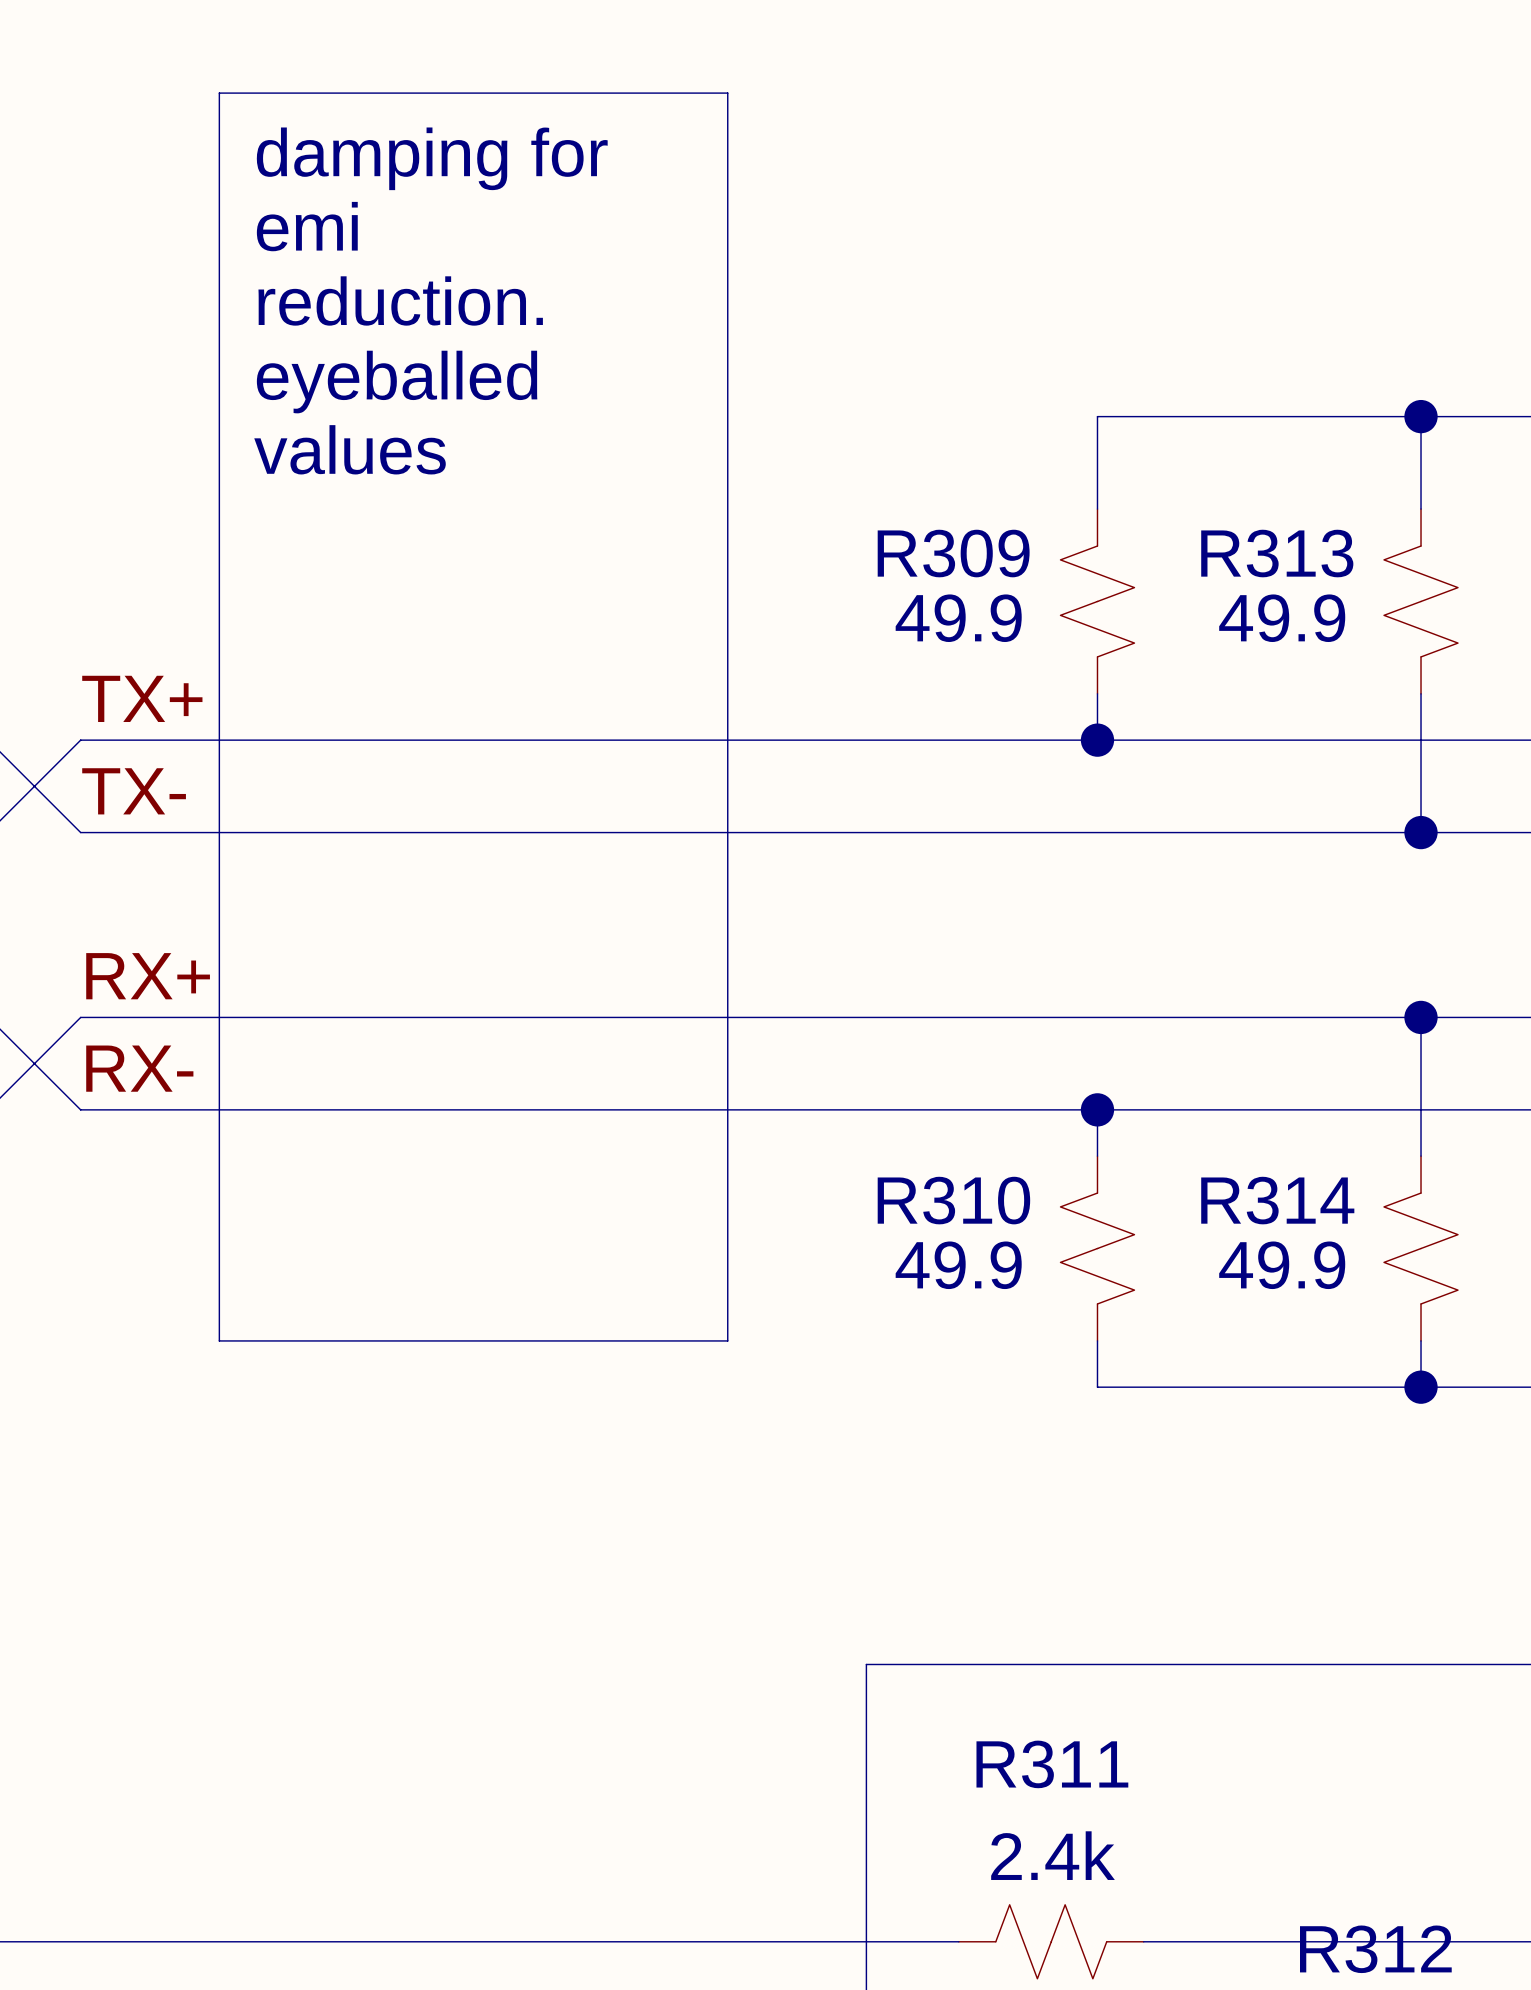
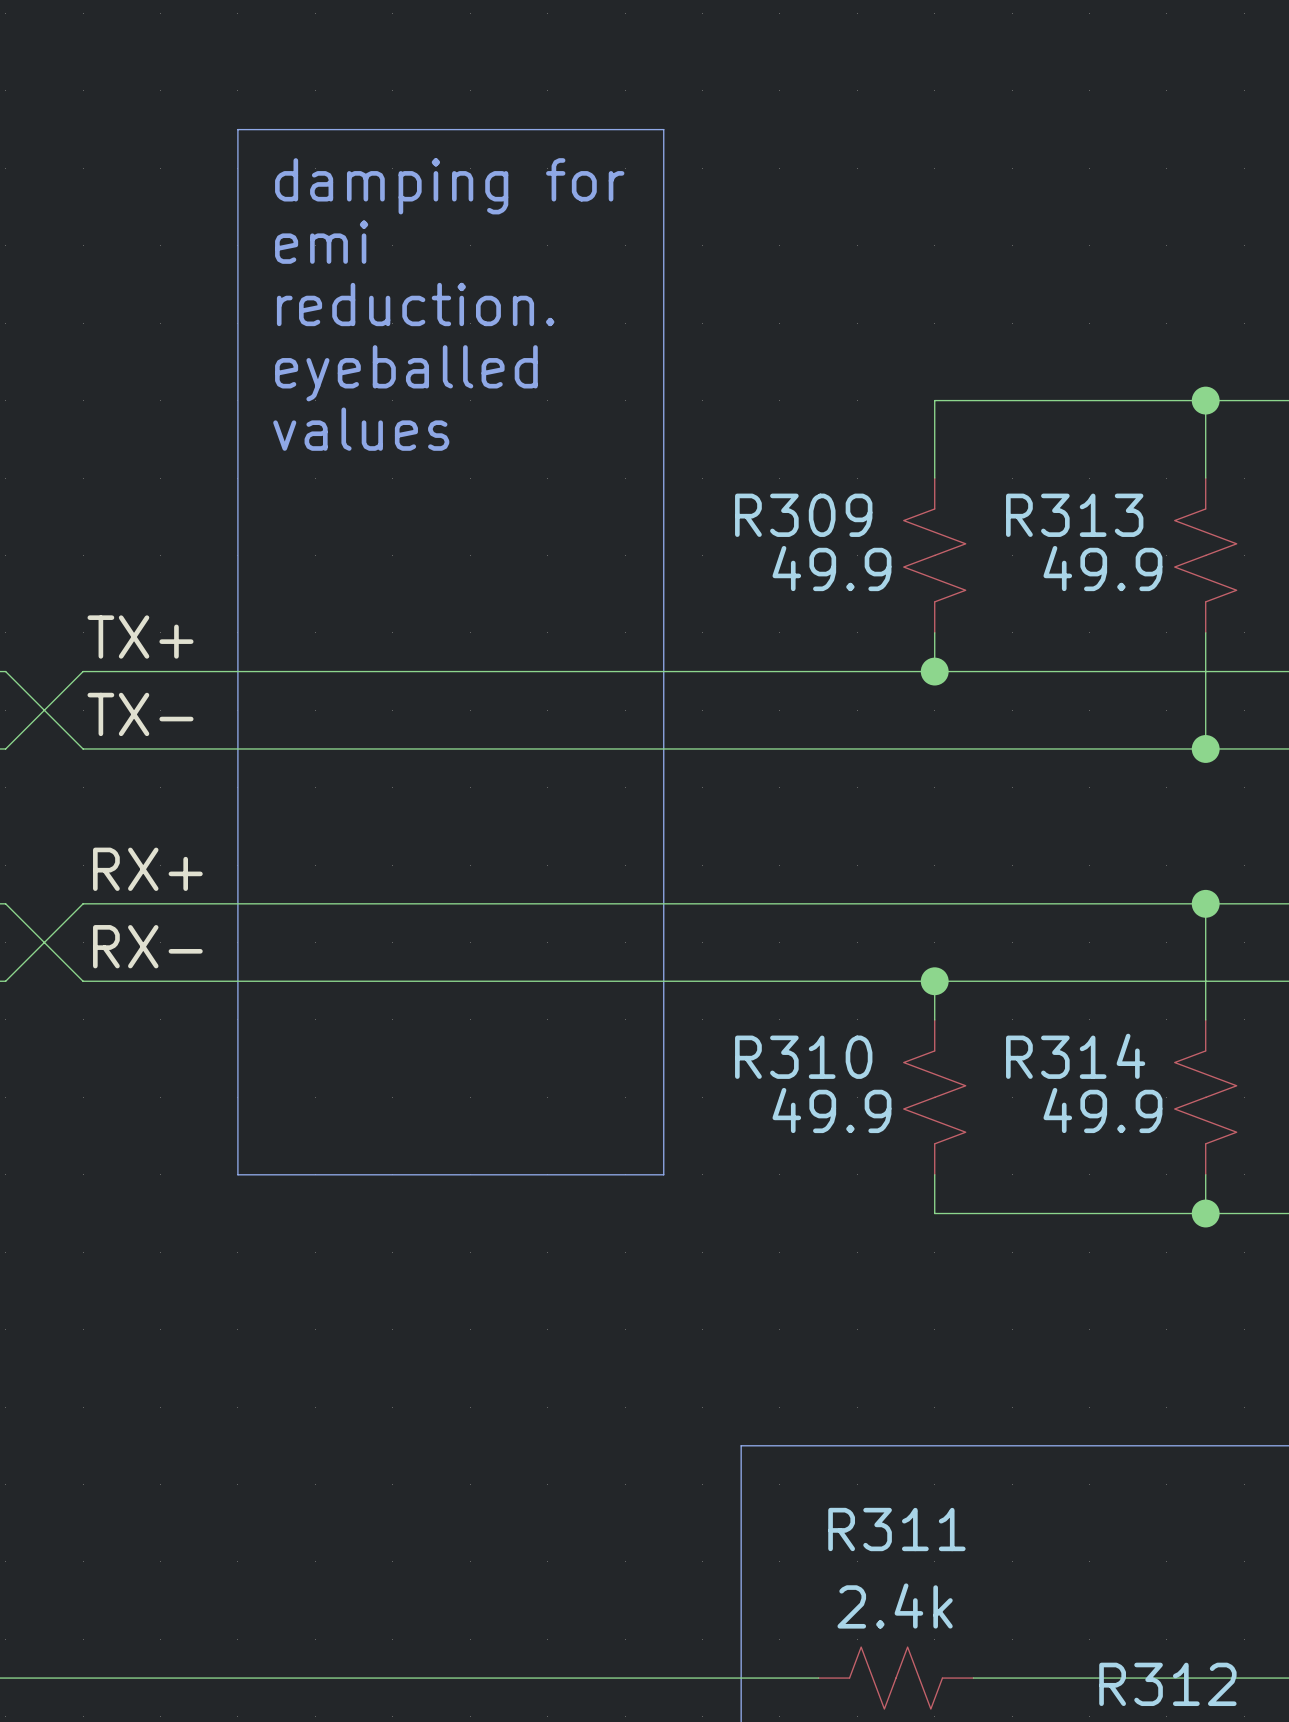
line: (265, 93) (219, 93) (219, 1340) (265, 1340) -> (237, 129) (237, 1174)
line: (727, 93) (727, 1340) -> (625, 129) (663, 129) (663, 1174) (625, 1174)
text position: damping for (432, 158) -> damping for (449, 186)
text position: emi (307, 226) -> emi (321, 242)
text position: reduction. (400, 300) -> reduction. (415, 304)
text position: eyeballed (397, 382) -> eyeballed (406, 373)
text position: values (350, 449) -> values (361, 429)

